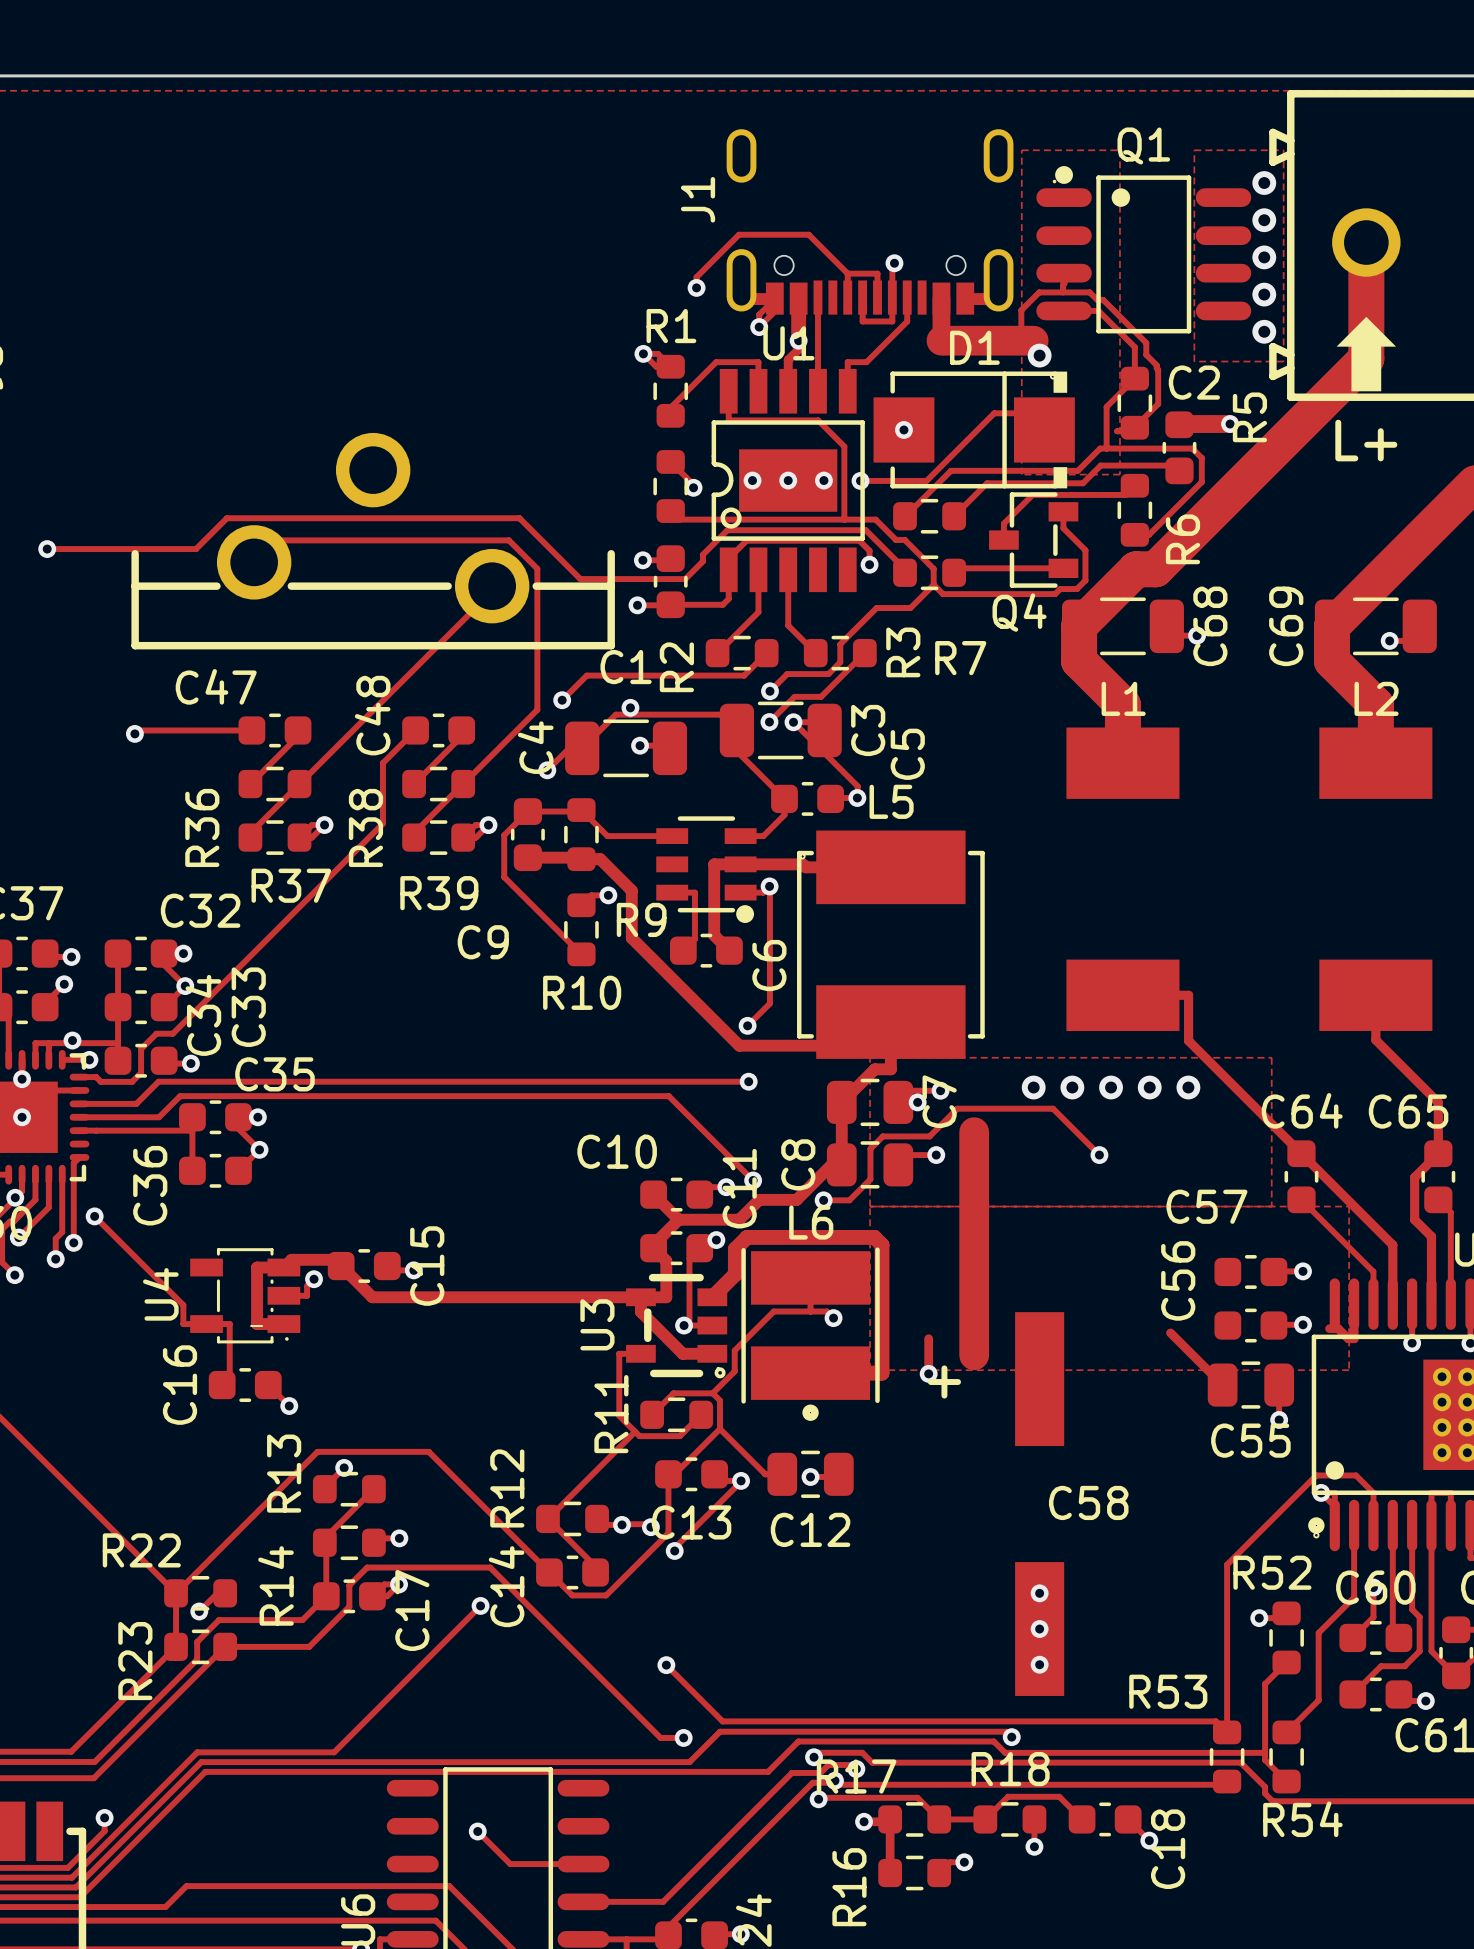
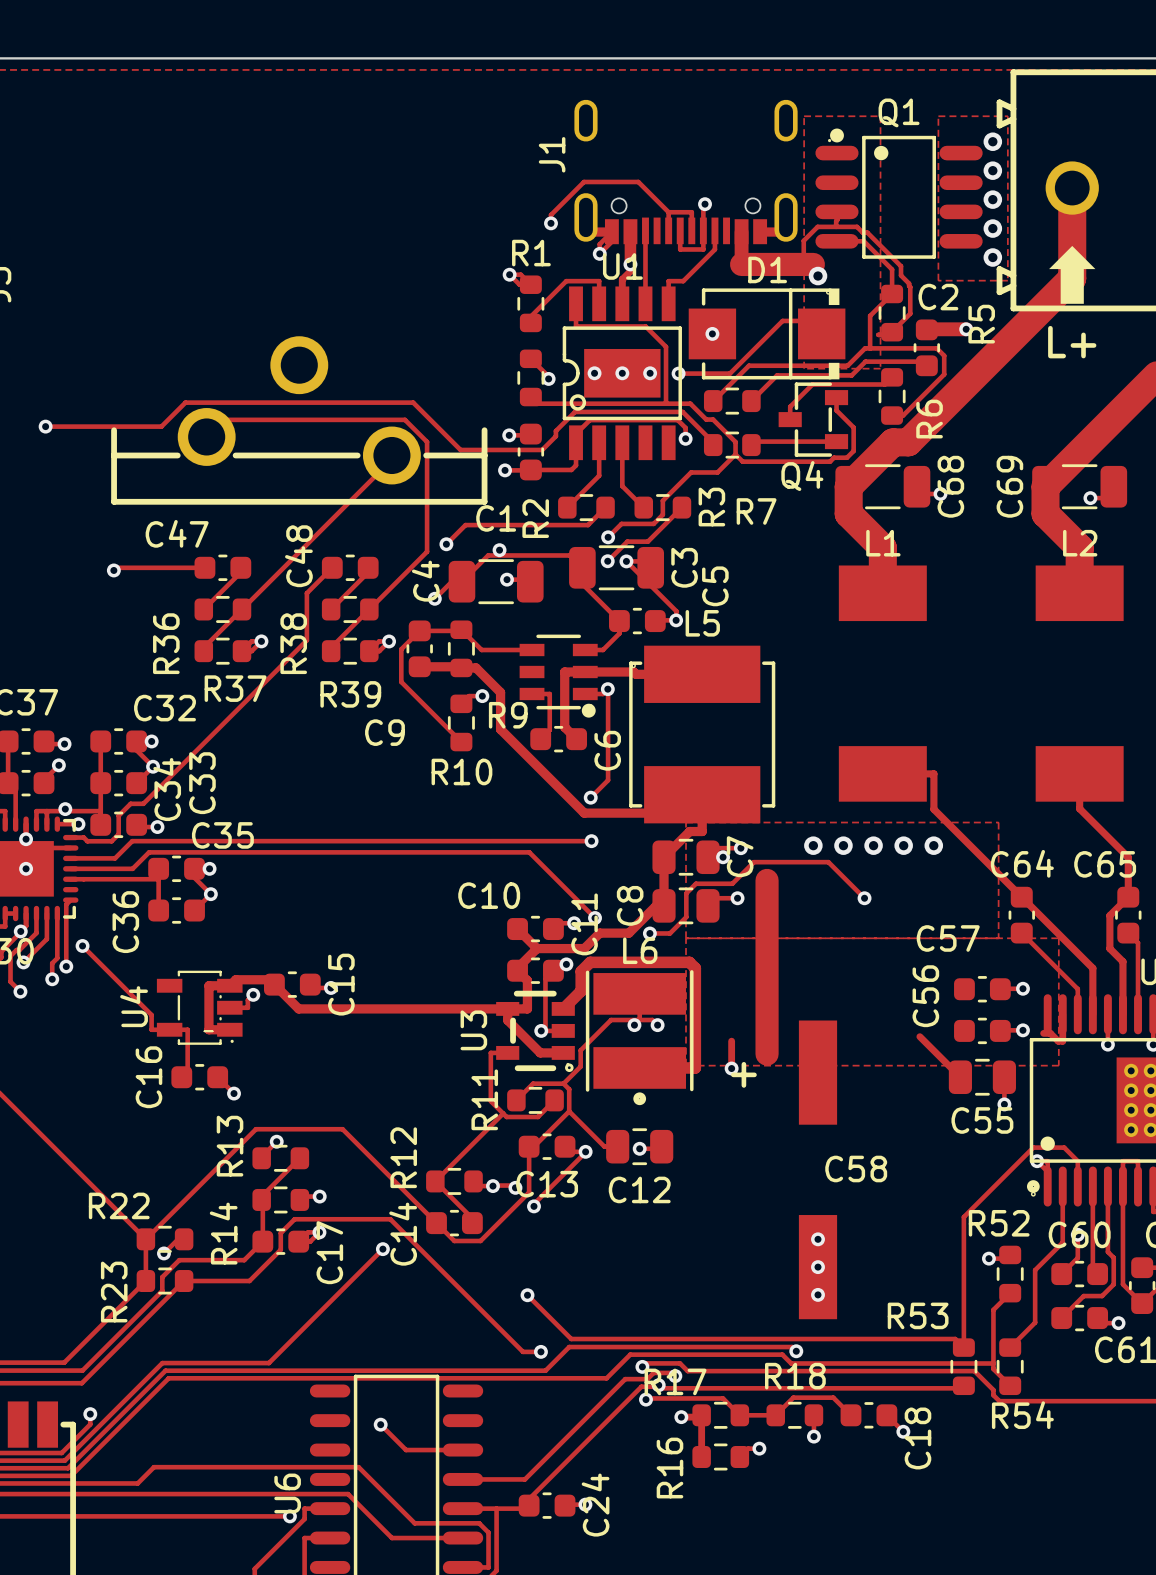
via: none -> (634, 1025)

